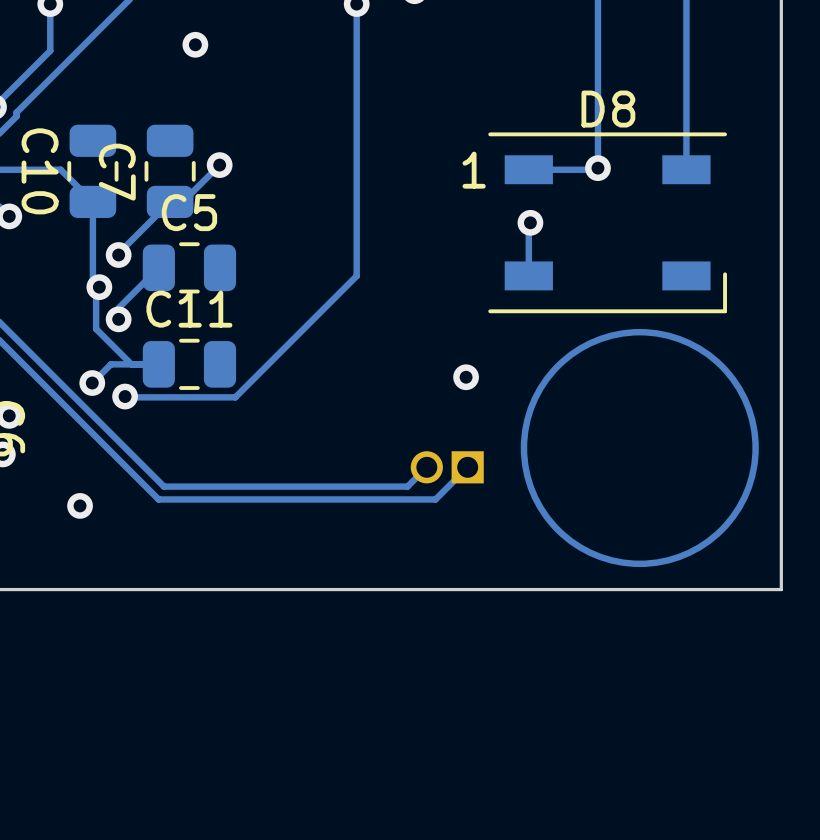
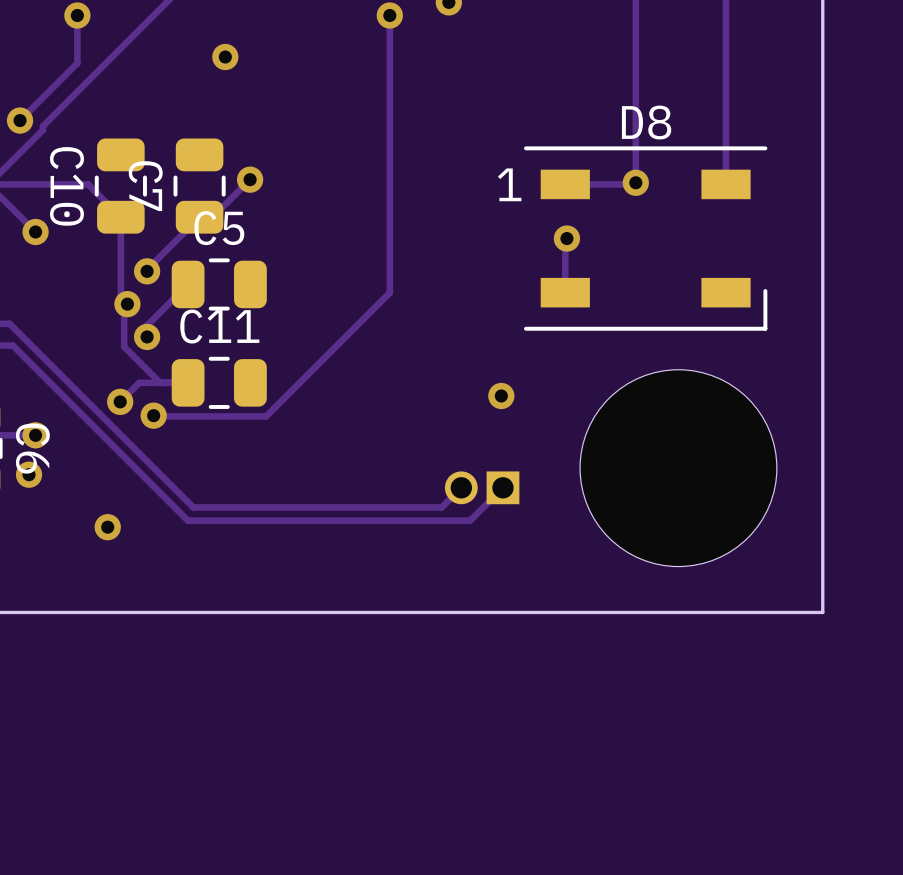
drawing: [520, 328, 759, 568] -> none
part: none -> (678, 468)

